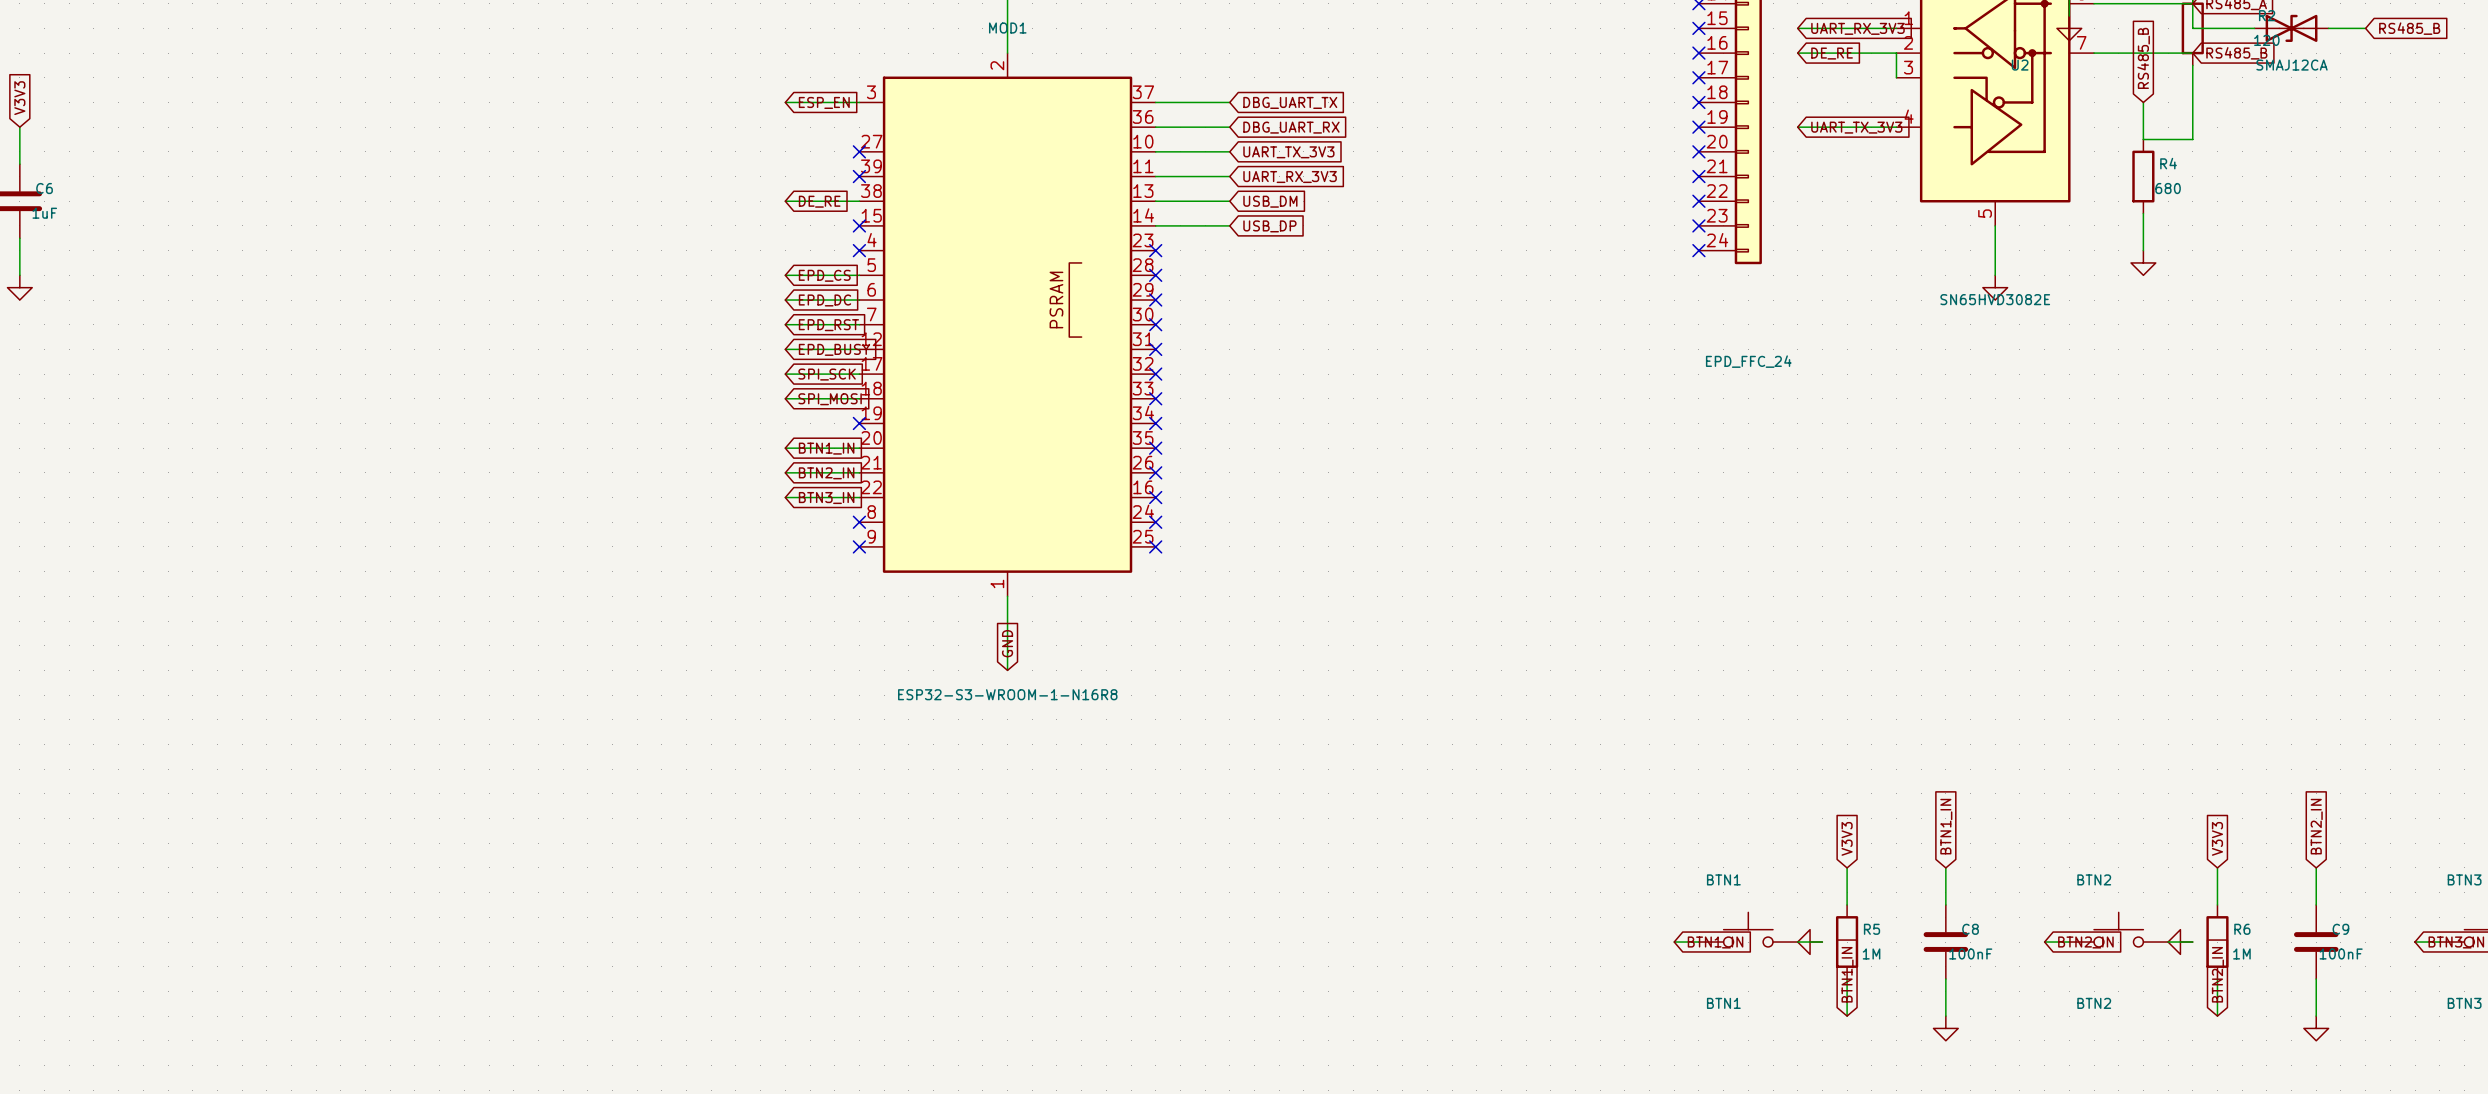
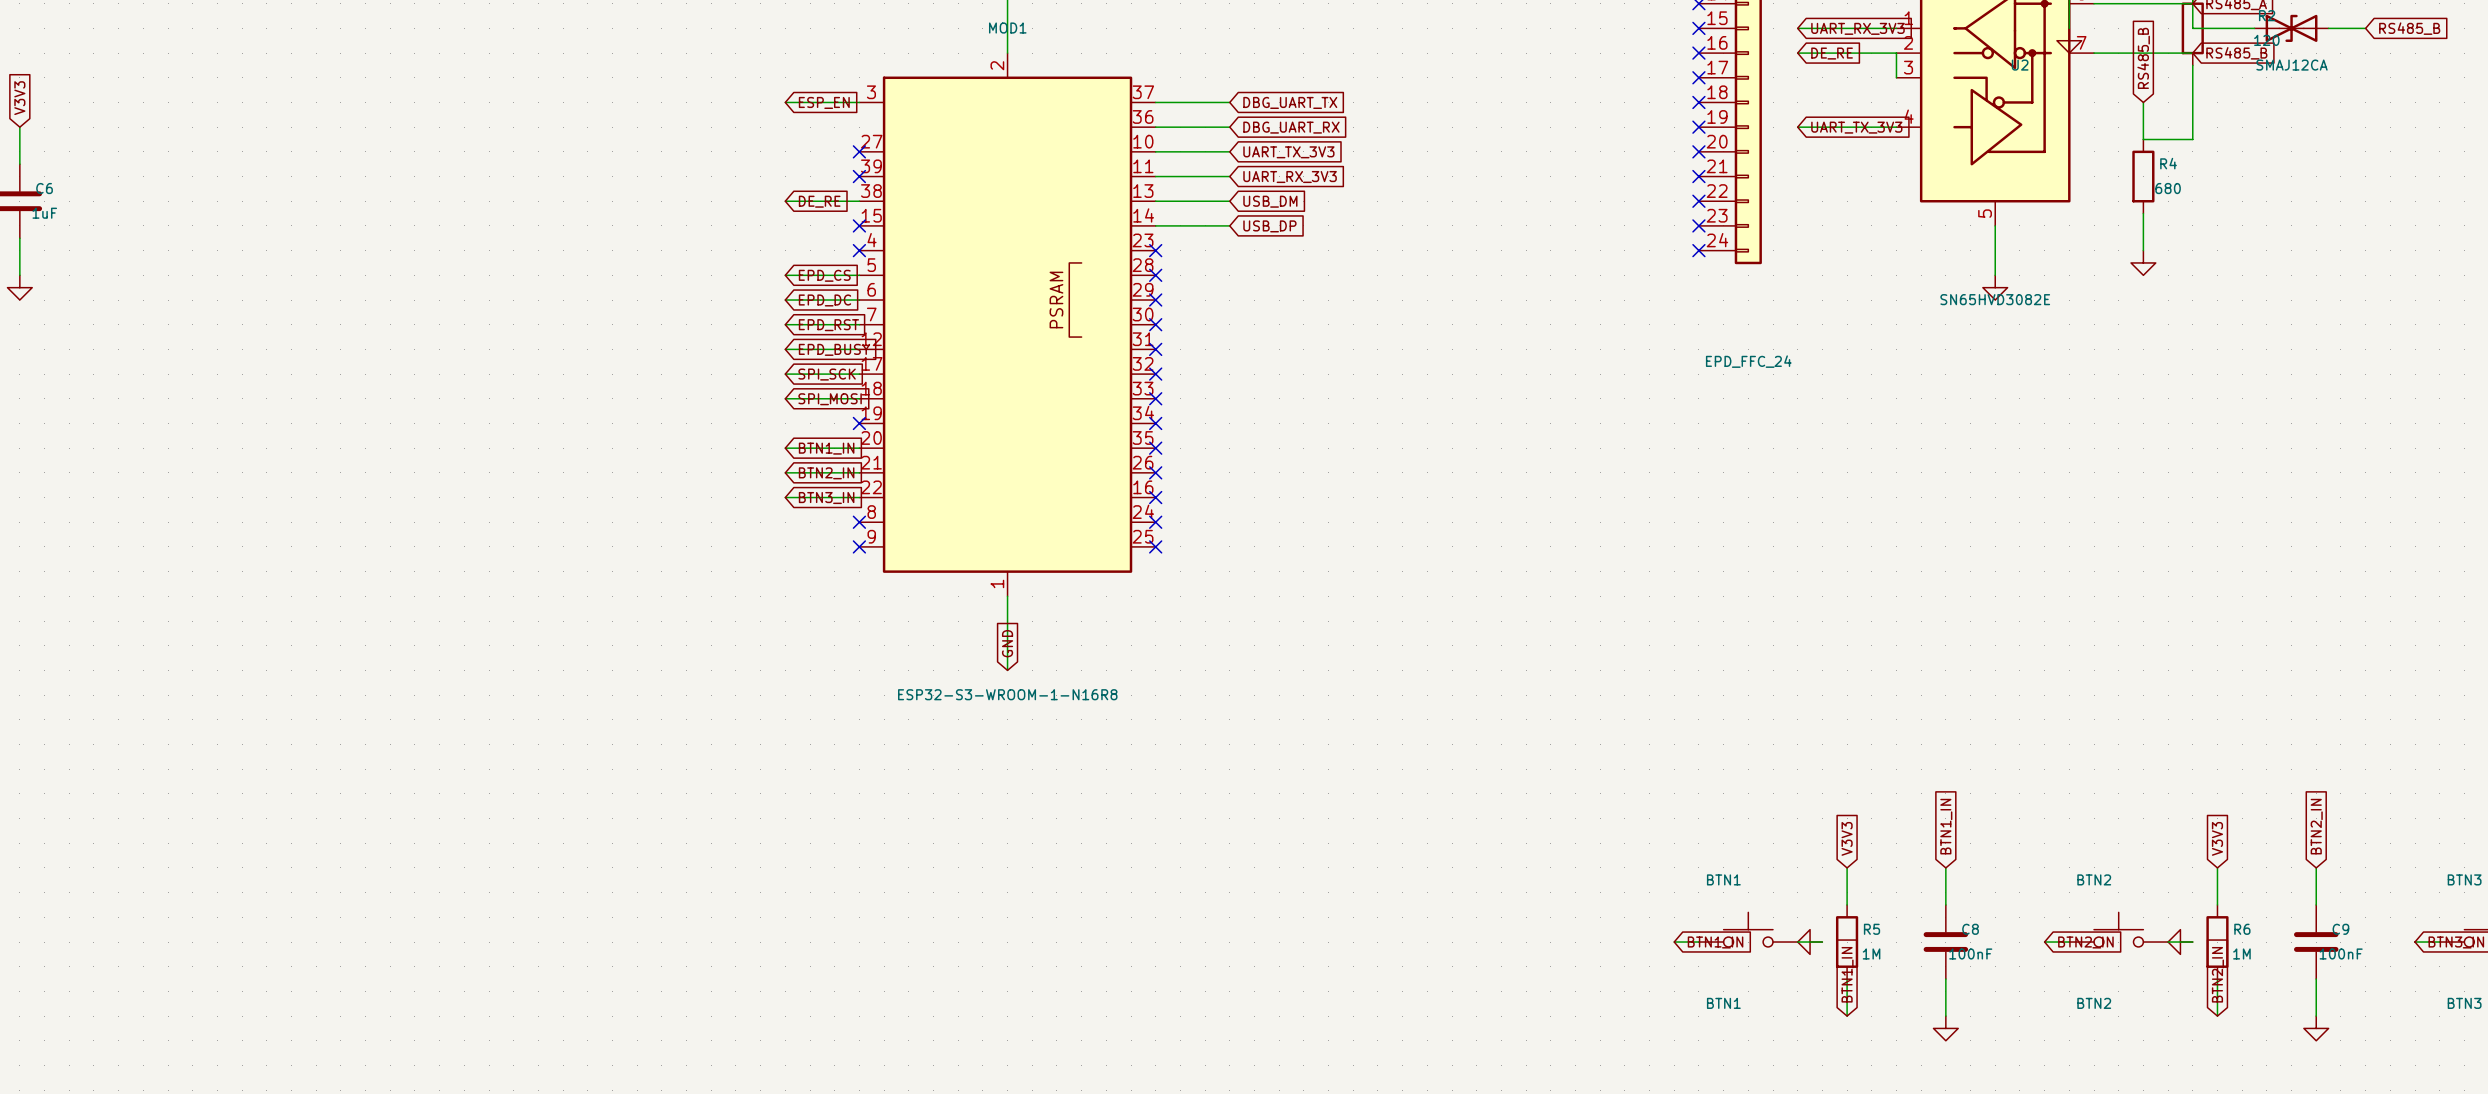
power symbol position: (2069, 28) -> (2069, 40)

